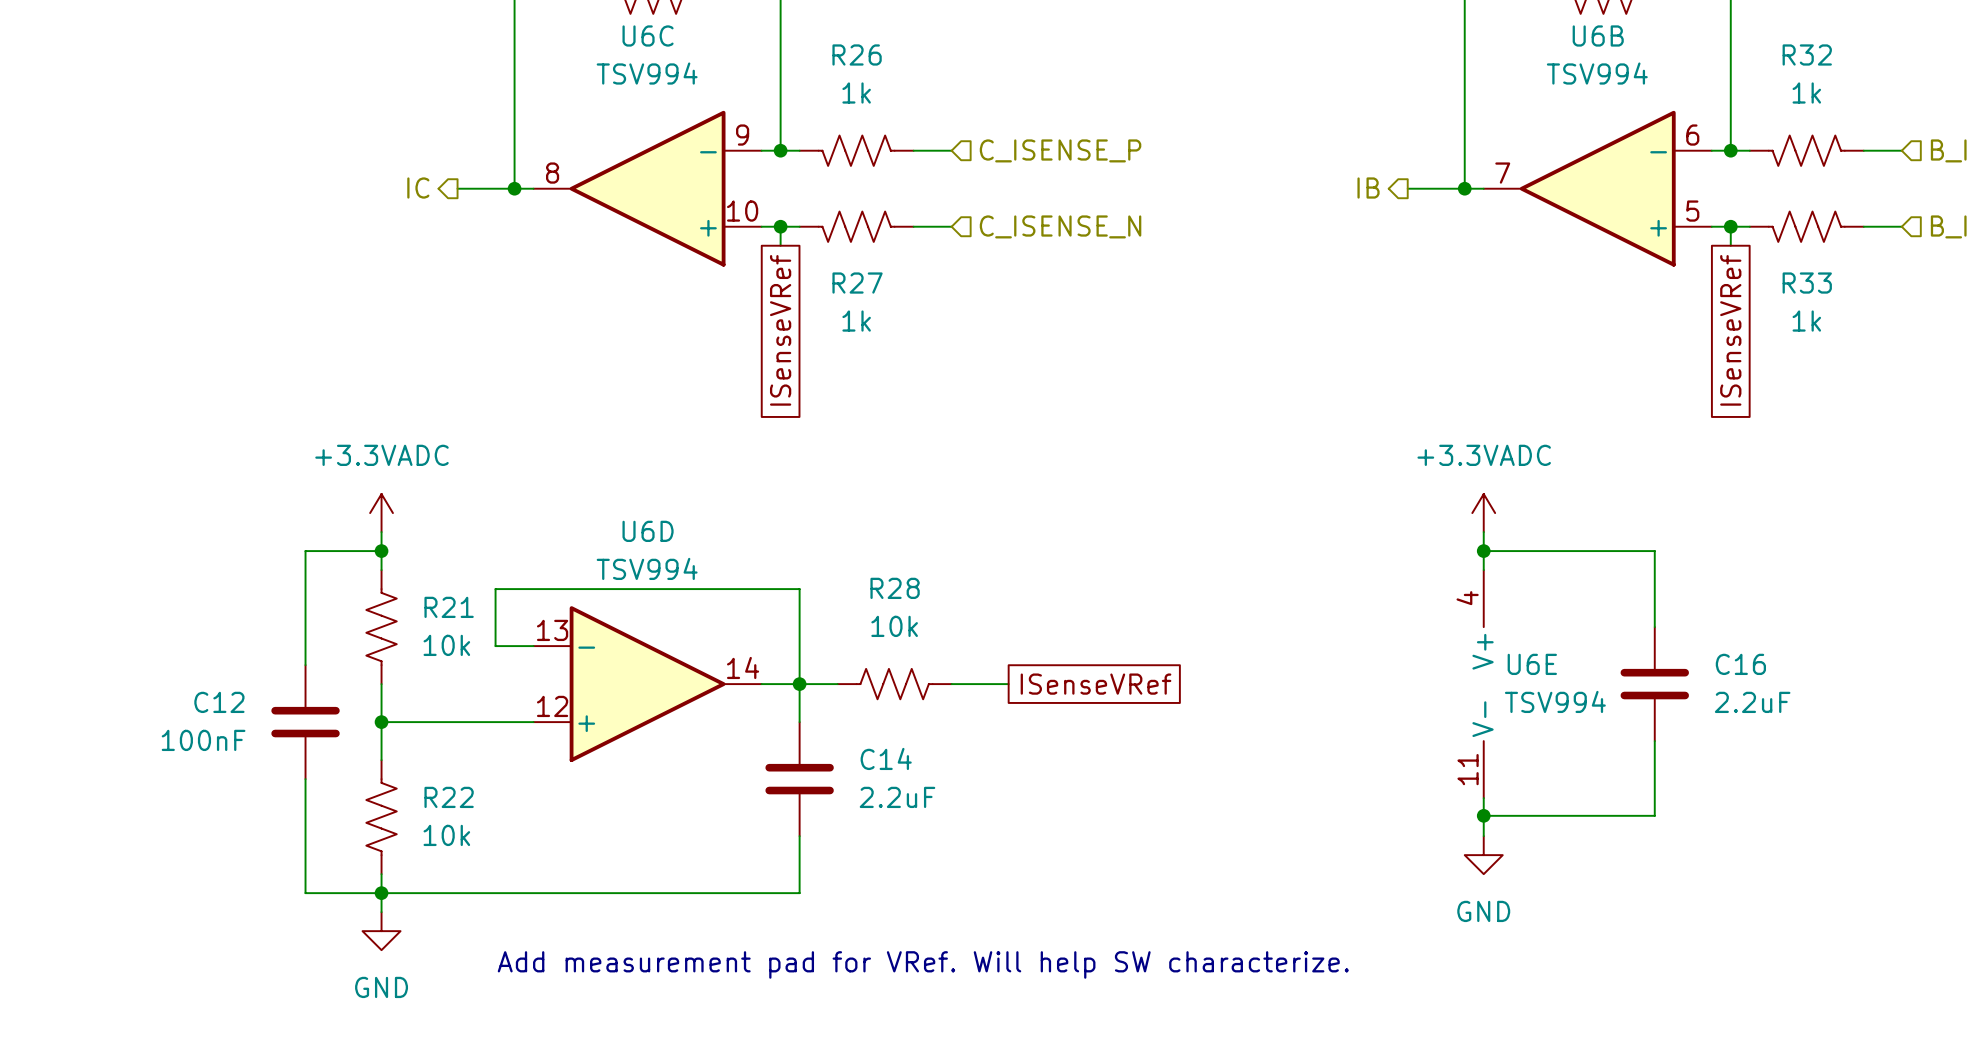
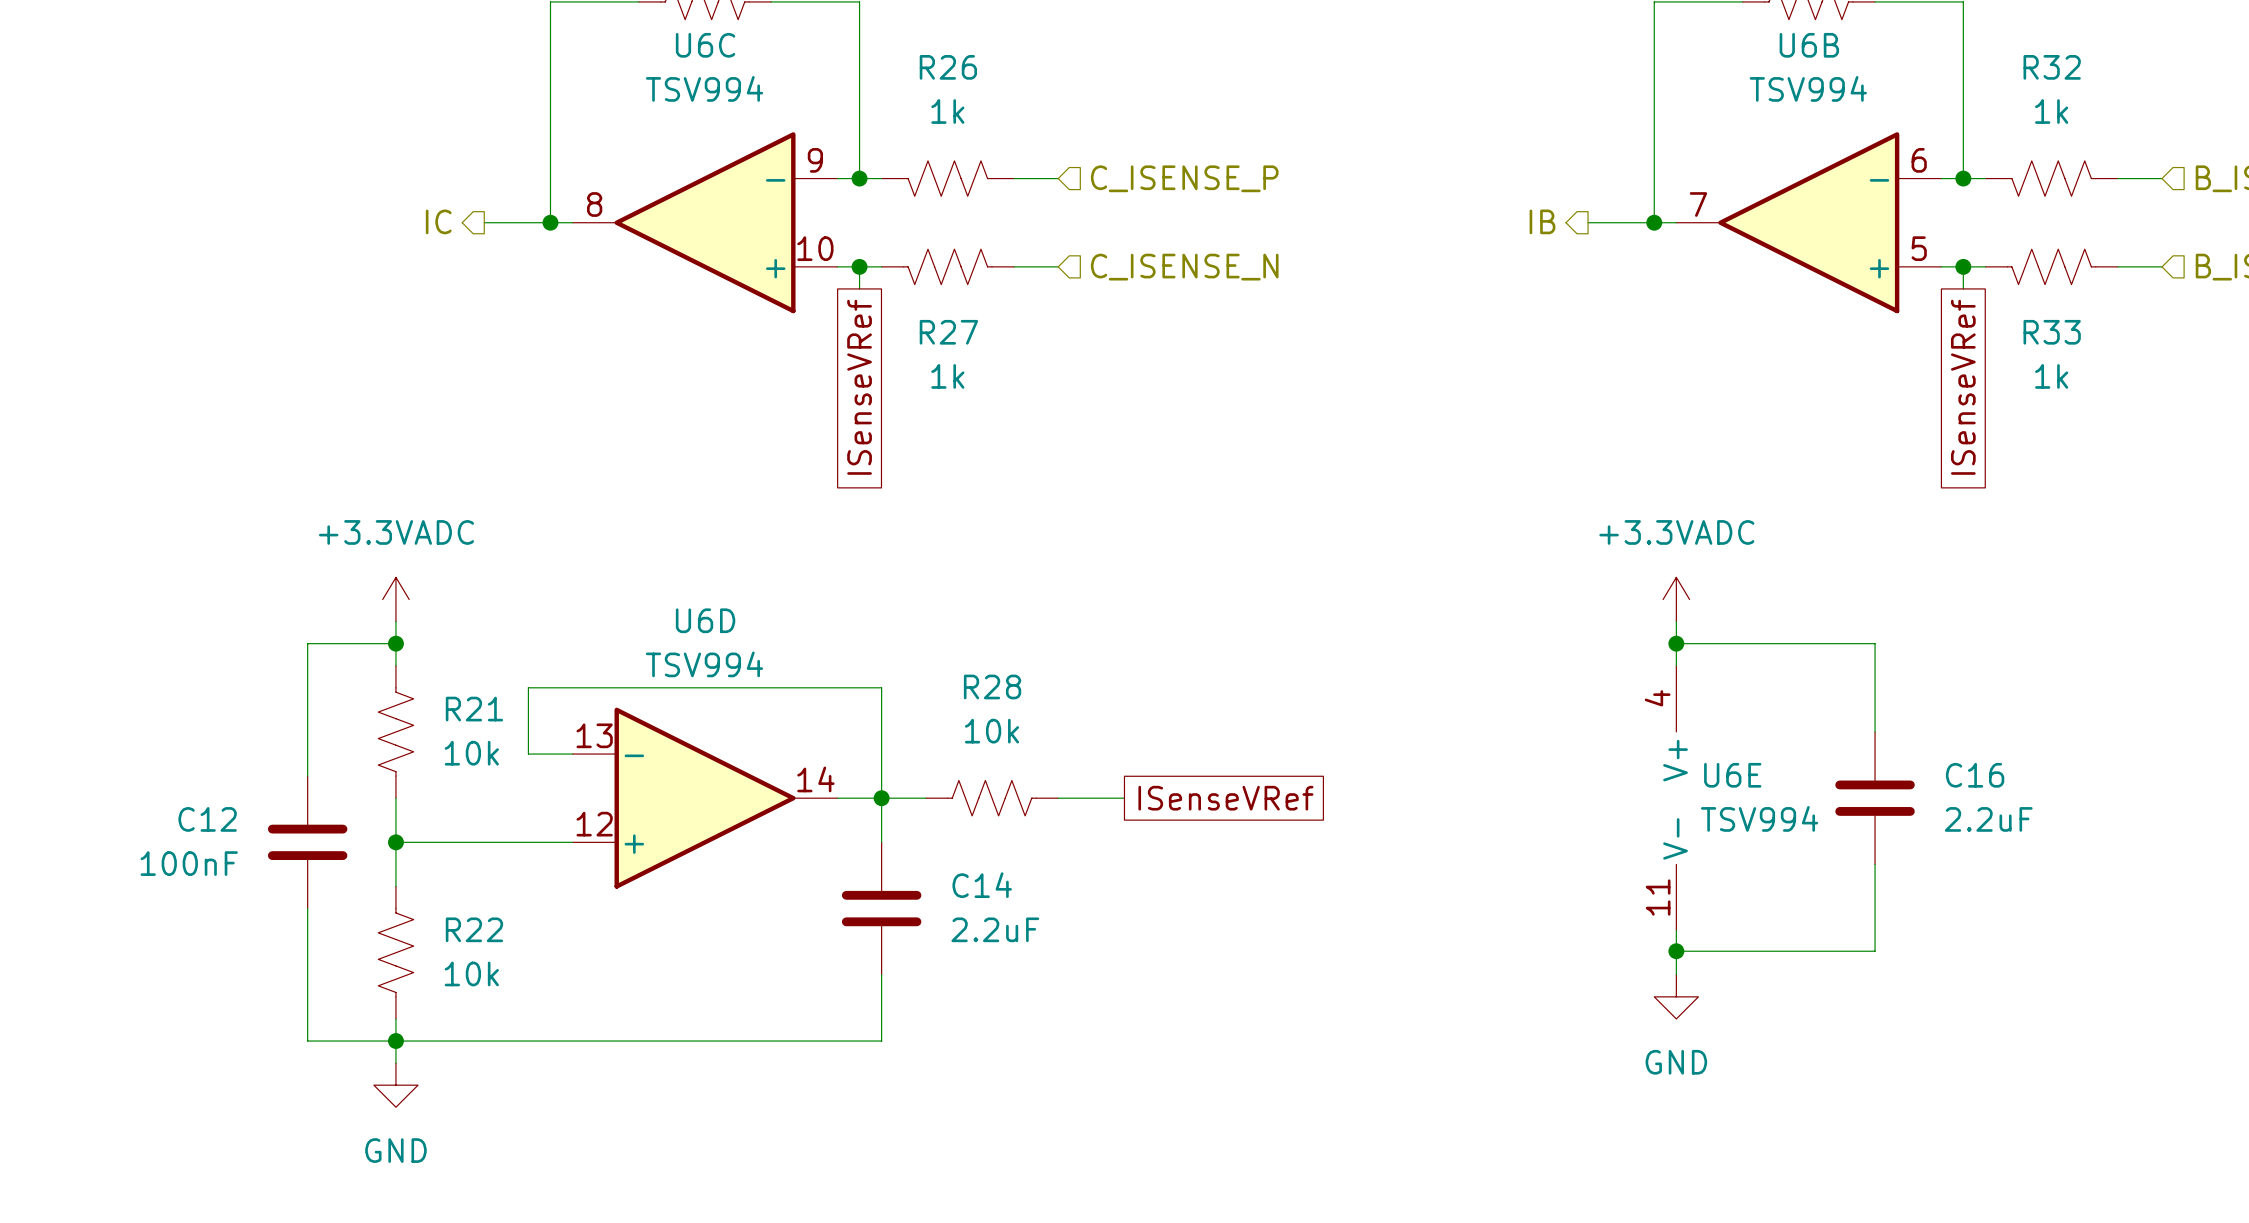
text: Add measurement pad for VRef. Will help SW characterize. (923, 964) -> none

